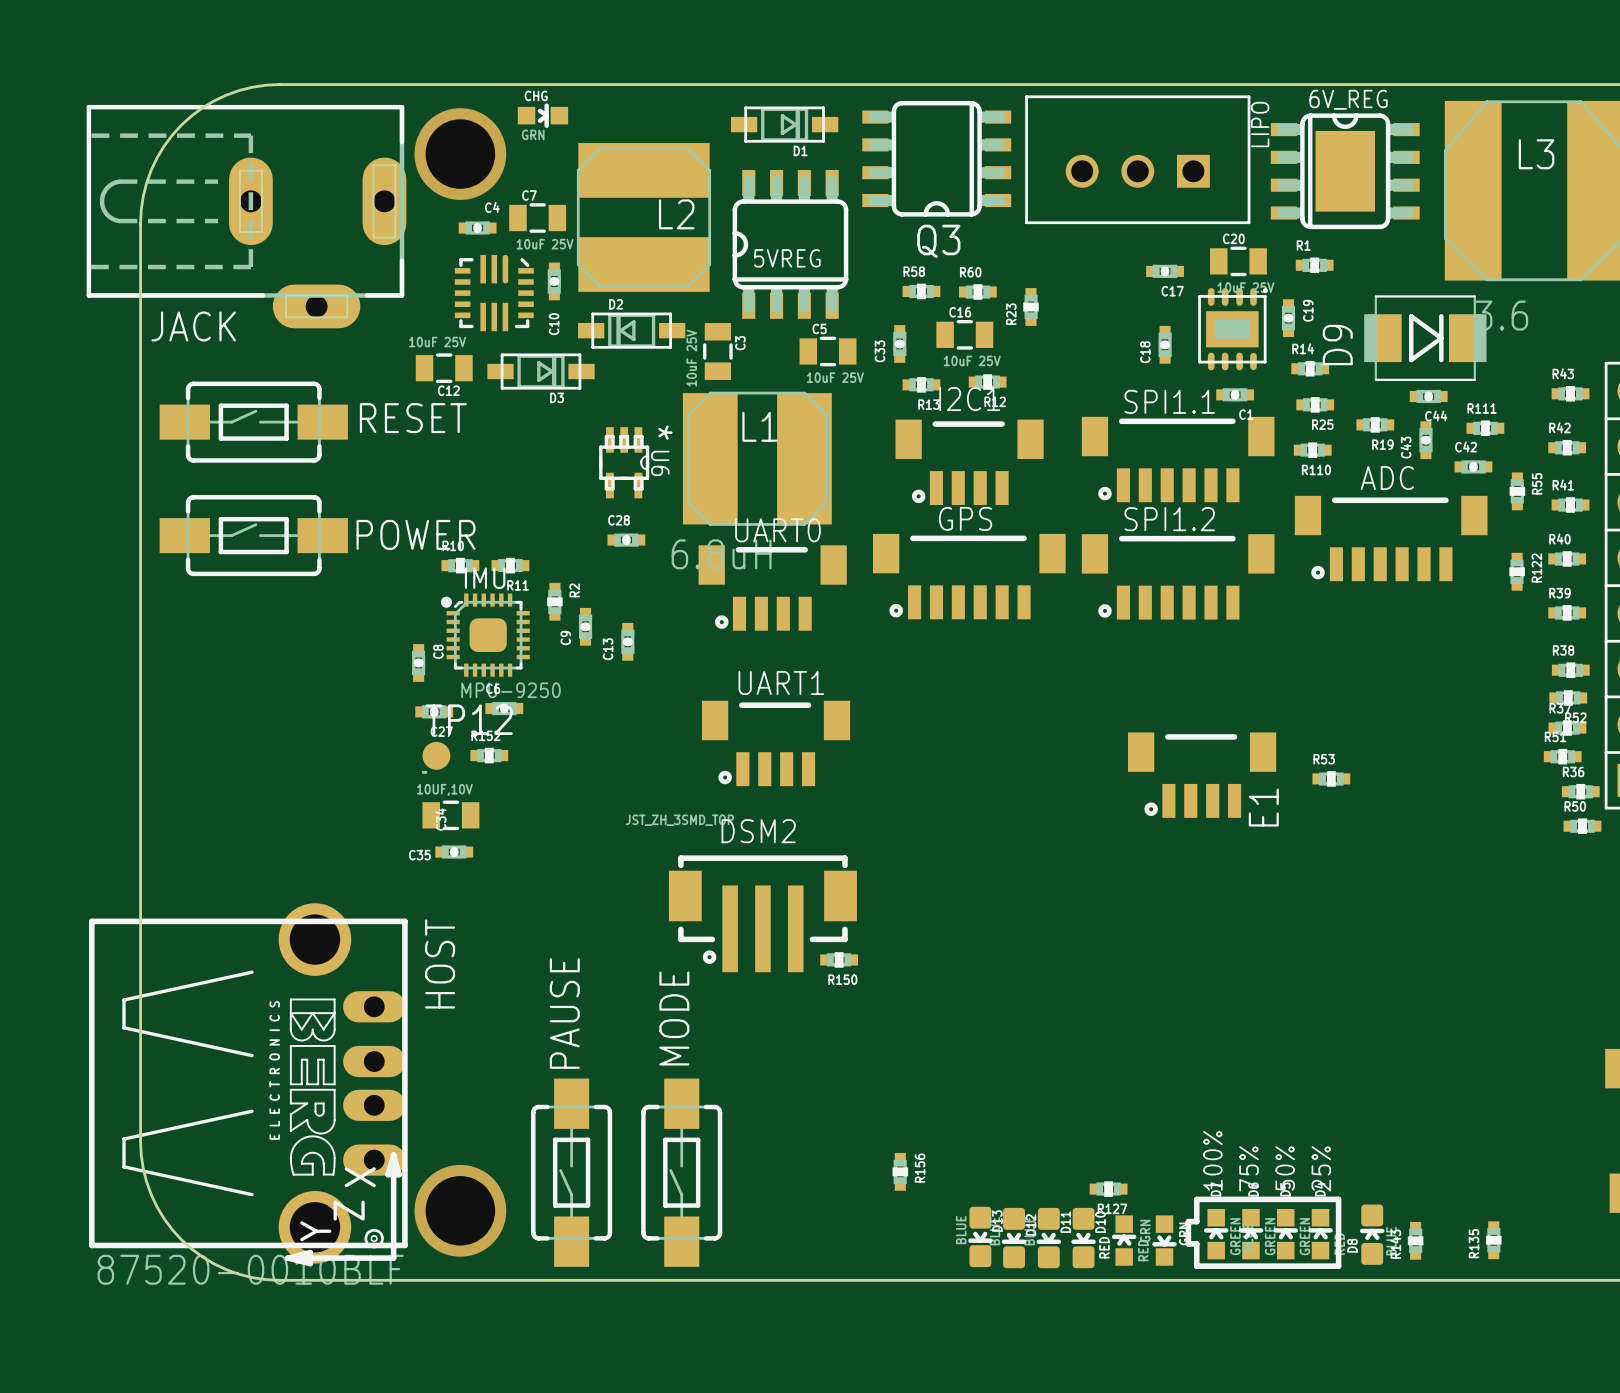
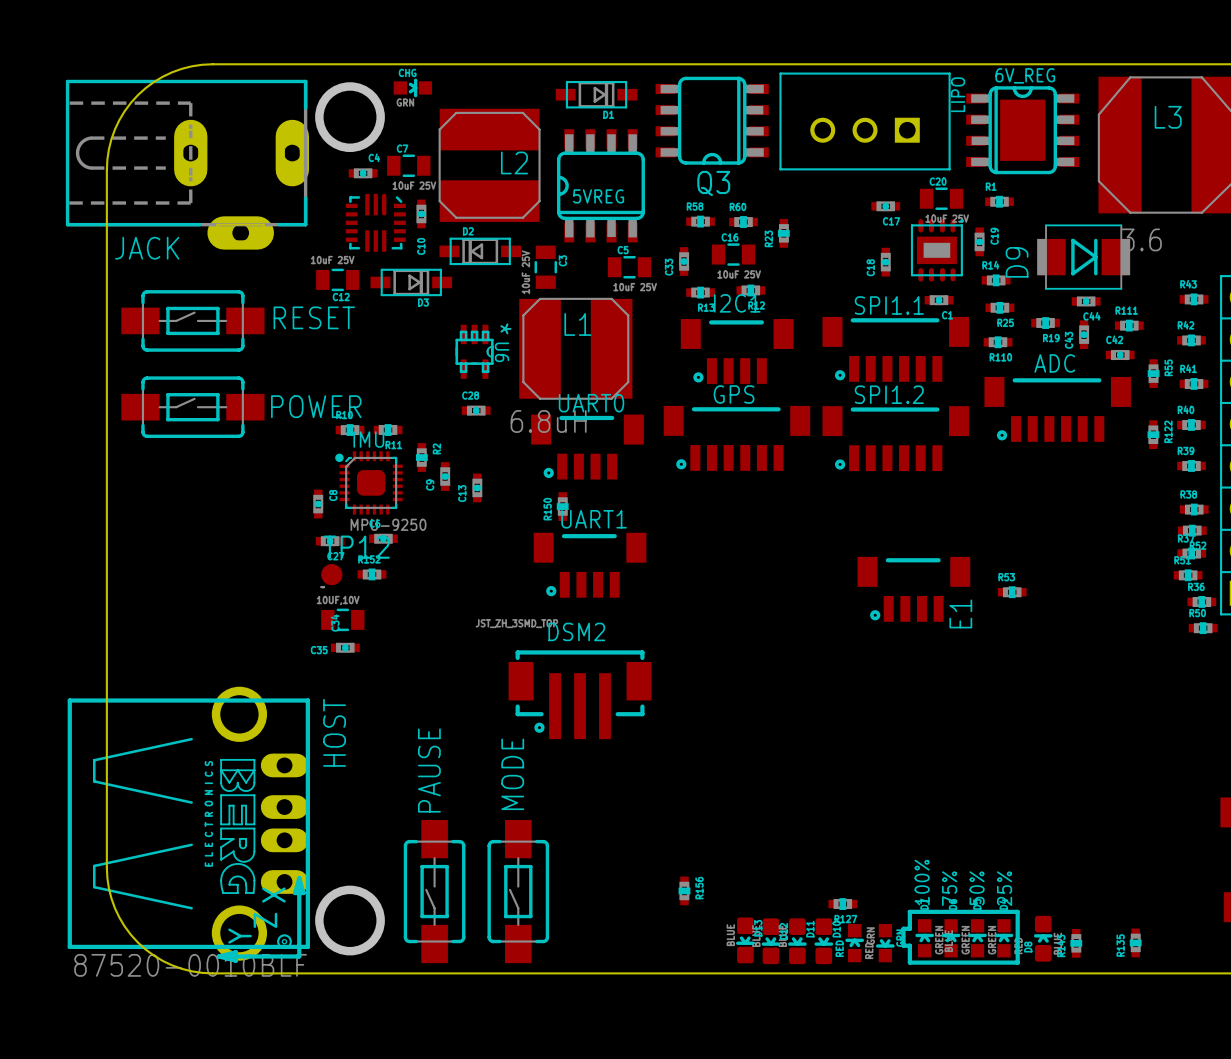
R150 rotation: 0° (839, 959) -> 90° clockwise (562, 506)
R150 position: (839, 959) -> (562, 506)

